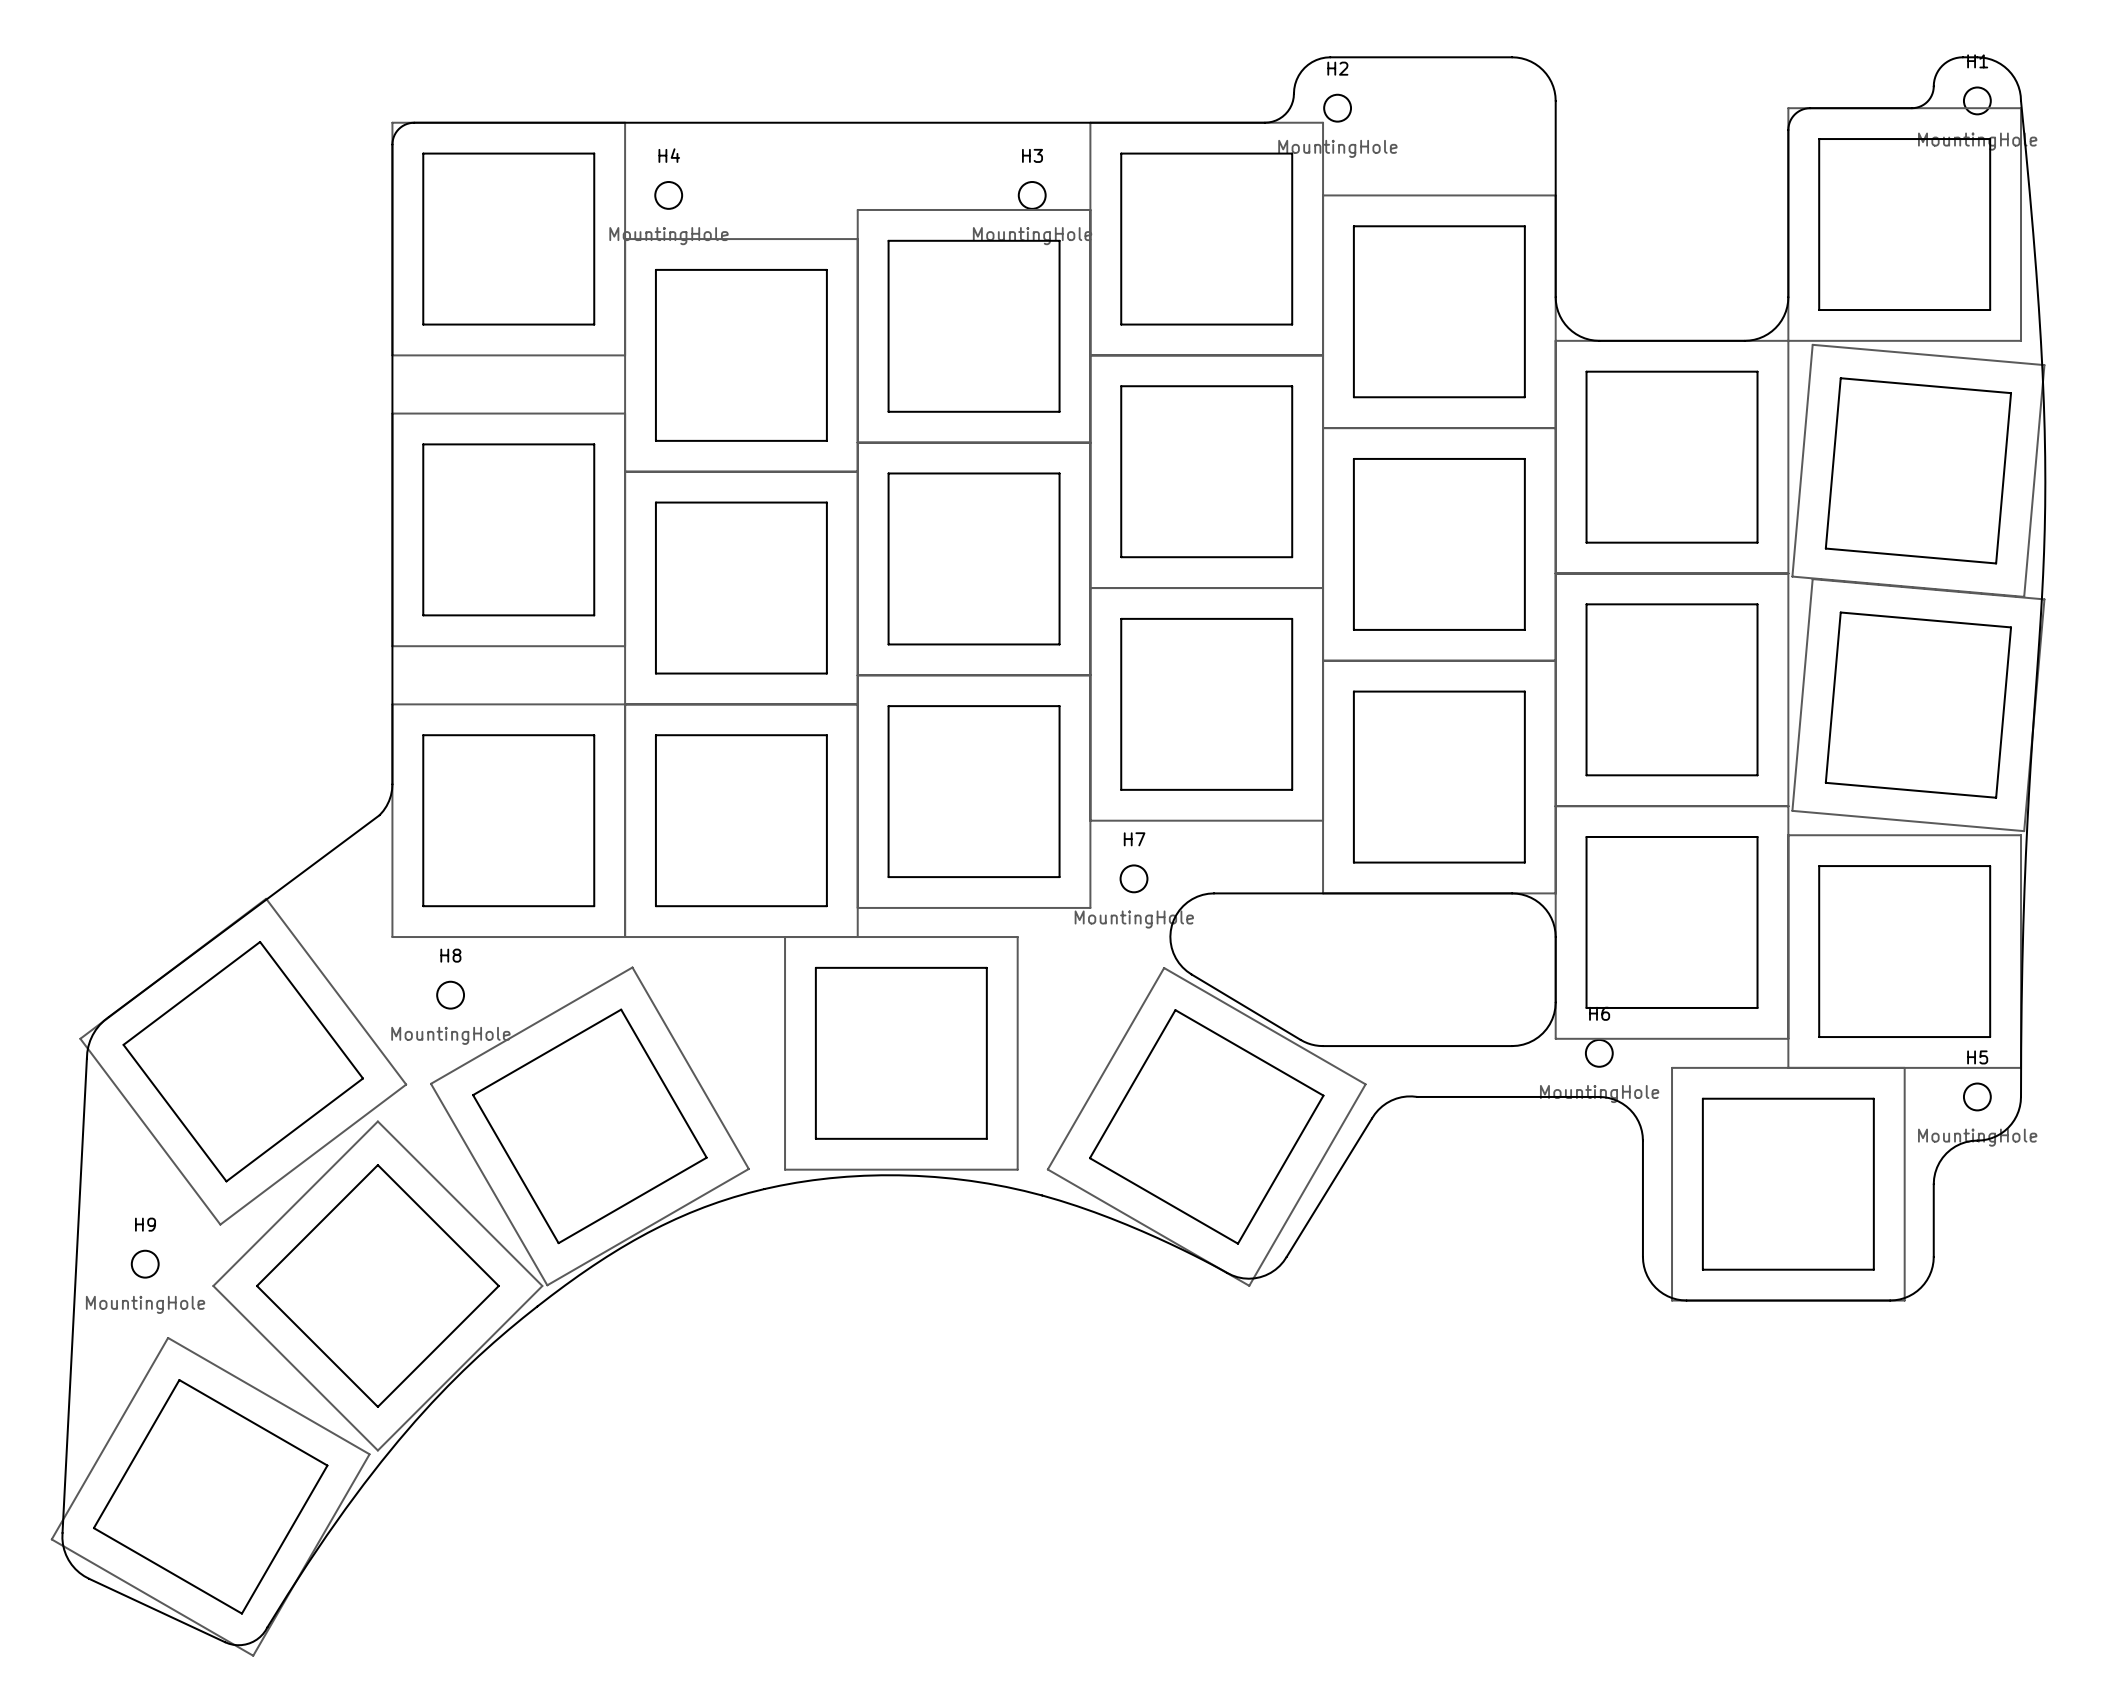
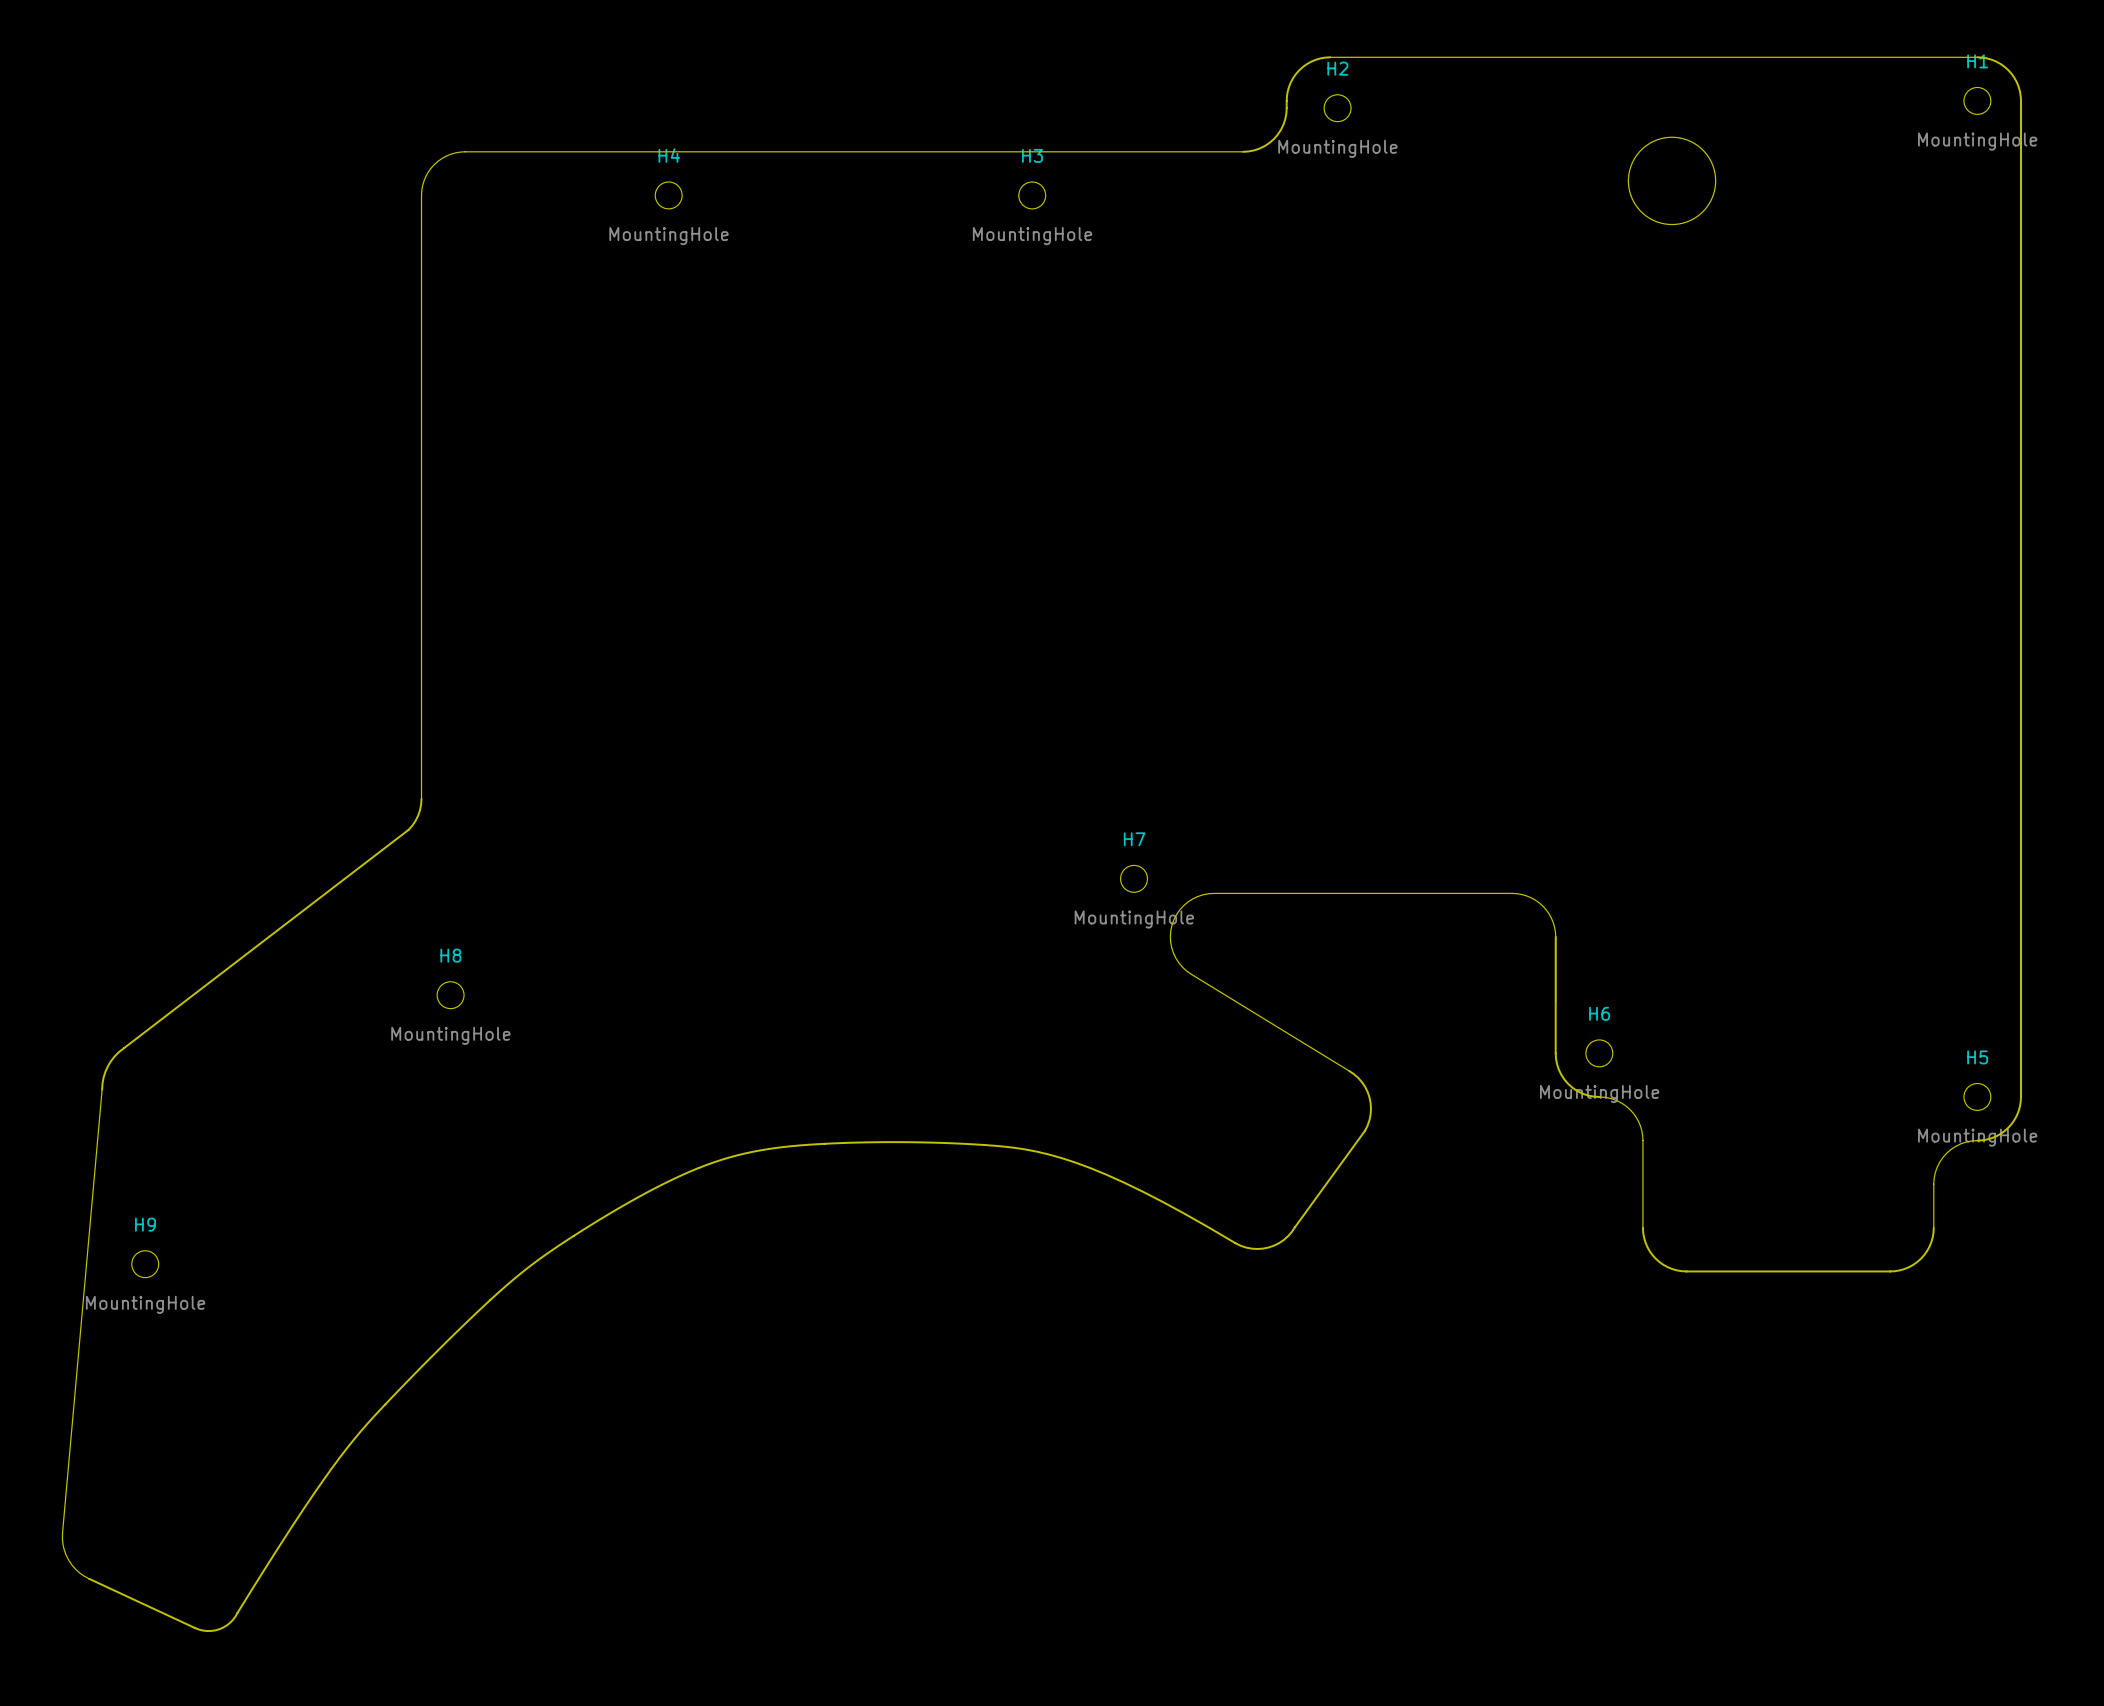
board edge: (1330, 57) (1316, 60) (1304, 67) (1296, 79) (1290, 108) (1282, 116) (1268, 122) (414, 122) (404, 124) (397, 130) (392, 144) (390, 795) (379, 815) (104, 1020) (90, 1040) (86, 1058) (62, 1532) -> (1330, 57) (1311, 61) (1296, 73) (1287, 91) (1286, 113) (1280, 130) (1264, 145) (1248, 151) (465, 151) (446, 156) (431, 168) (423, 181) (421, 195) (420, 810) (408, 829) (119, 1051) (107, 1066) (102, 1083) (62, 1532)
board edge: (1512, 57) (1526, 59) (1539, 66) (1549, 77) (1553, 86) (1555, 100) (1555, 302) (1560, 316) (1568, 328) (1580, 336) (1594, 340) (1749, 340) (1763, 336) (1778, 324) (1785, 311) (1788, 297) (1788, 127) (1791, 118) (1798, 111) (1810, 108) (1919, 106) (1925, 103) (1931, 95) (1935, 76) (1940, 68) (1950, 60) (1962, 57) (1987, 58) (2004, 66) (2016, 82) (2021, 100) -> none
board edge: (2021, 100) (2033, 233) (2042, 372) (2045, 482) (2043, 574) (2025, 854) (2020, 1101) (2016, 1115) (2008, 1127) (1996, 1136) (1977, 1140) -> (1512, 57) (1977, 57) (1991, 59) (2000, 63) (2011, 73) (2016, 82) (2021, 100) (2021, 1096) (2018, 1111) (2008, 1127) (1996, 1136) (1977, 1140)
drawing: [50, 107, 2046, 1657] -> none
round board edge: none -> [1627, 136, 1717, 226]
board edge: none -> (1555, 937) (1557, 1064) (1561, 1075) (1572, 1087) (1588, 1095) (1599, 1096)
drawing: [1046, 967, 1367, 1287] -> none
board edge: (1191, 974) (1300, 1039) (1319, 1045) (1517, 1045) (1533, 1040) (1546, 1029) (1554, 1013) (1555, 1002) -> none
board edge: (1599, 1096) (1406, 1096) (1391, 1100) (1374, 1114) (1283, 1261) (1270, 1272) (1254, 1278) (1232, 1275) (1156, 1237) (1094, 1212) (1042, 1195) (988, 1183) (934, 1176) (864, 1175) (796, 1182) (733, 1197) (675, 1219) (606, 1256) (537, 1306) (478, 1356) (431, 1403) (381, 1461) (326, 1535) (265, 1630) (253, 1641) (241, 1645) (229, 1643) (89, 1578) -> (1191, 974) (1353, 1074) (1365, 1086) (1369, 1097) (1370, 1114) (1365, 1130) (1291, 1231) (1279, 1243) (1257, 1249) (1240, 1245) (1162, 1202) (1106, 1174) (1062, 1158) (1026, 1149) (953, 1143) (852, 1142) (782, 1147) (729, 1157) (674, 1178) (601, 1218) (535, 1262) (484, 1305) (411, 1377) (354, 1439) (314, 1492) (235, 1616) (226, 1625) (211, 1630) (199, 1629) (89, 1578)
board edge: (1642, 1227) (1643, 1261) (1647, 1275) (1655, 1287) (1672, 1298) (1686, 1300) (1890, 1300) (1909, 1296) (1920, 1287) (1927, 1280) (1933, 1261) (1933, 1227) -> (1642, 1227) (1645, 1242) (1652, 1255) (1663, 1264) (1676, 1270) (1890, 1271) (1909, 1267) (1920, 1258) (1929, 1246) (1933, 1227)

